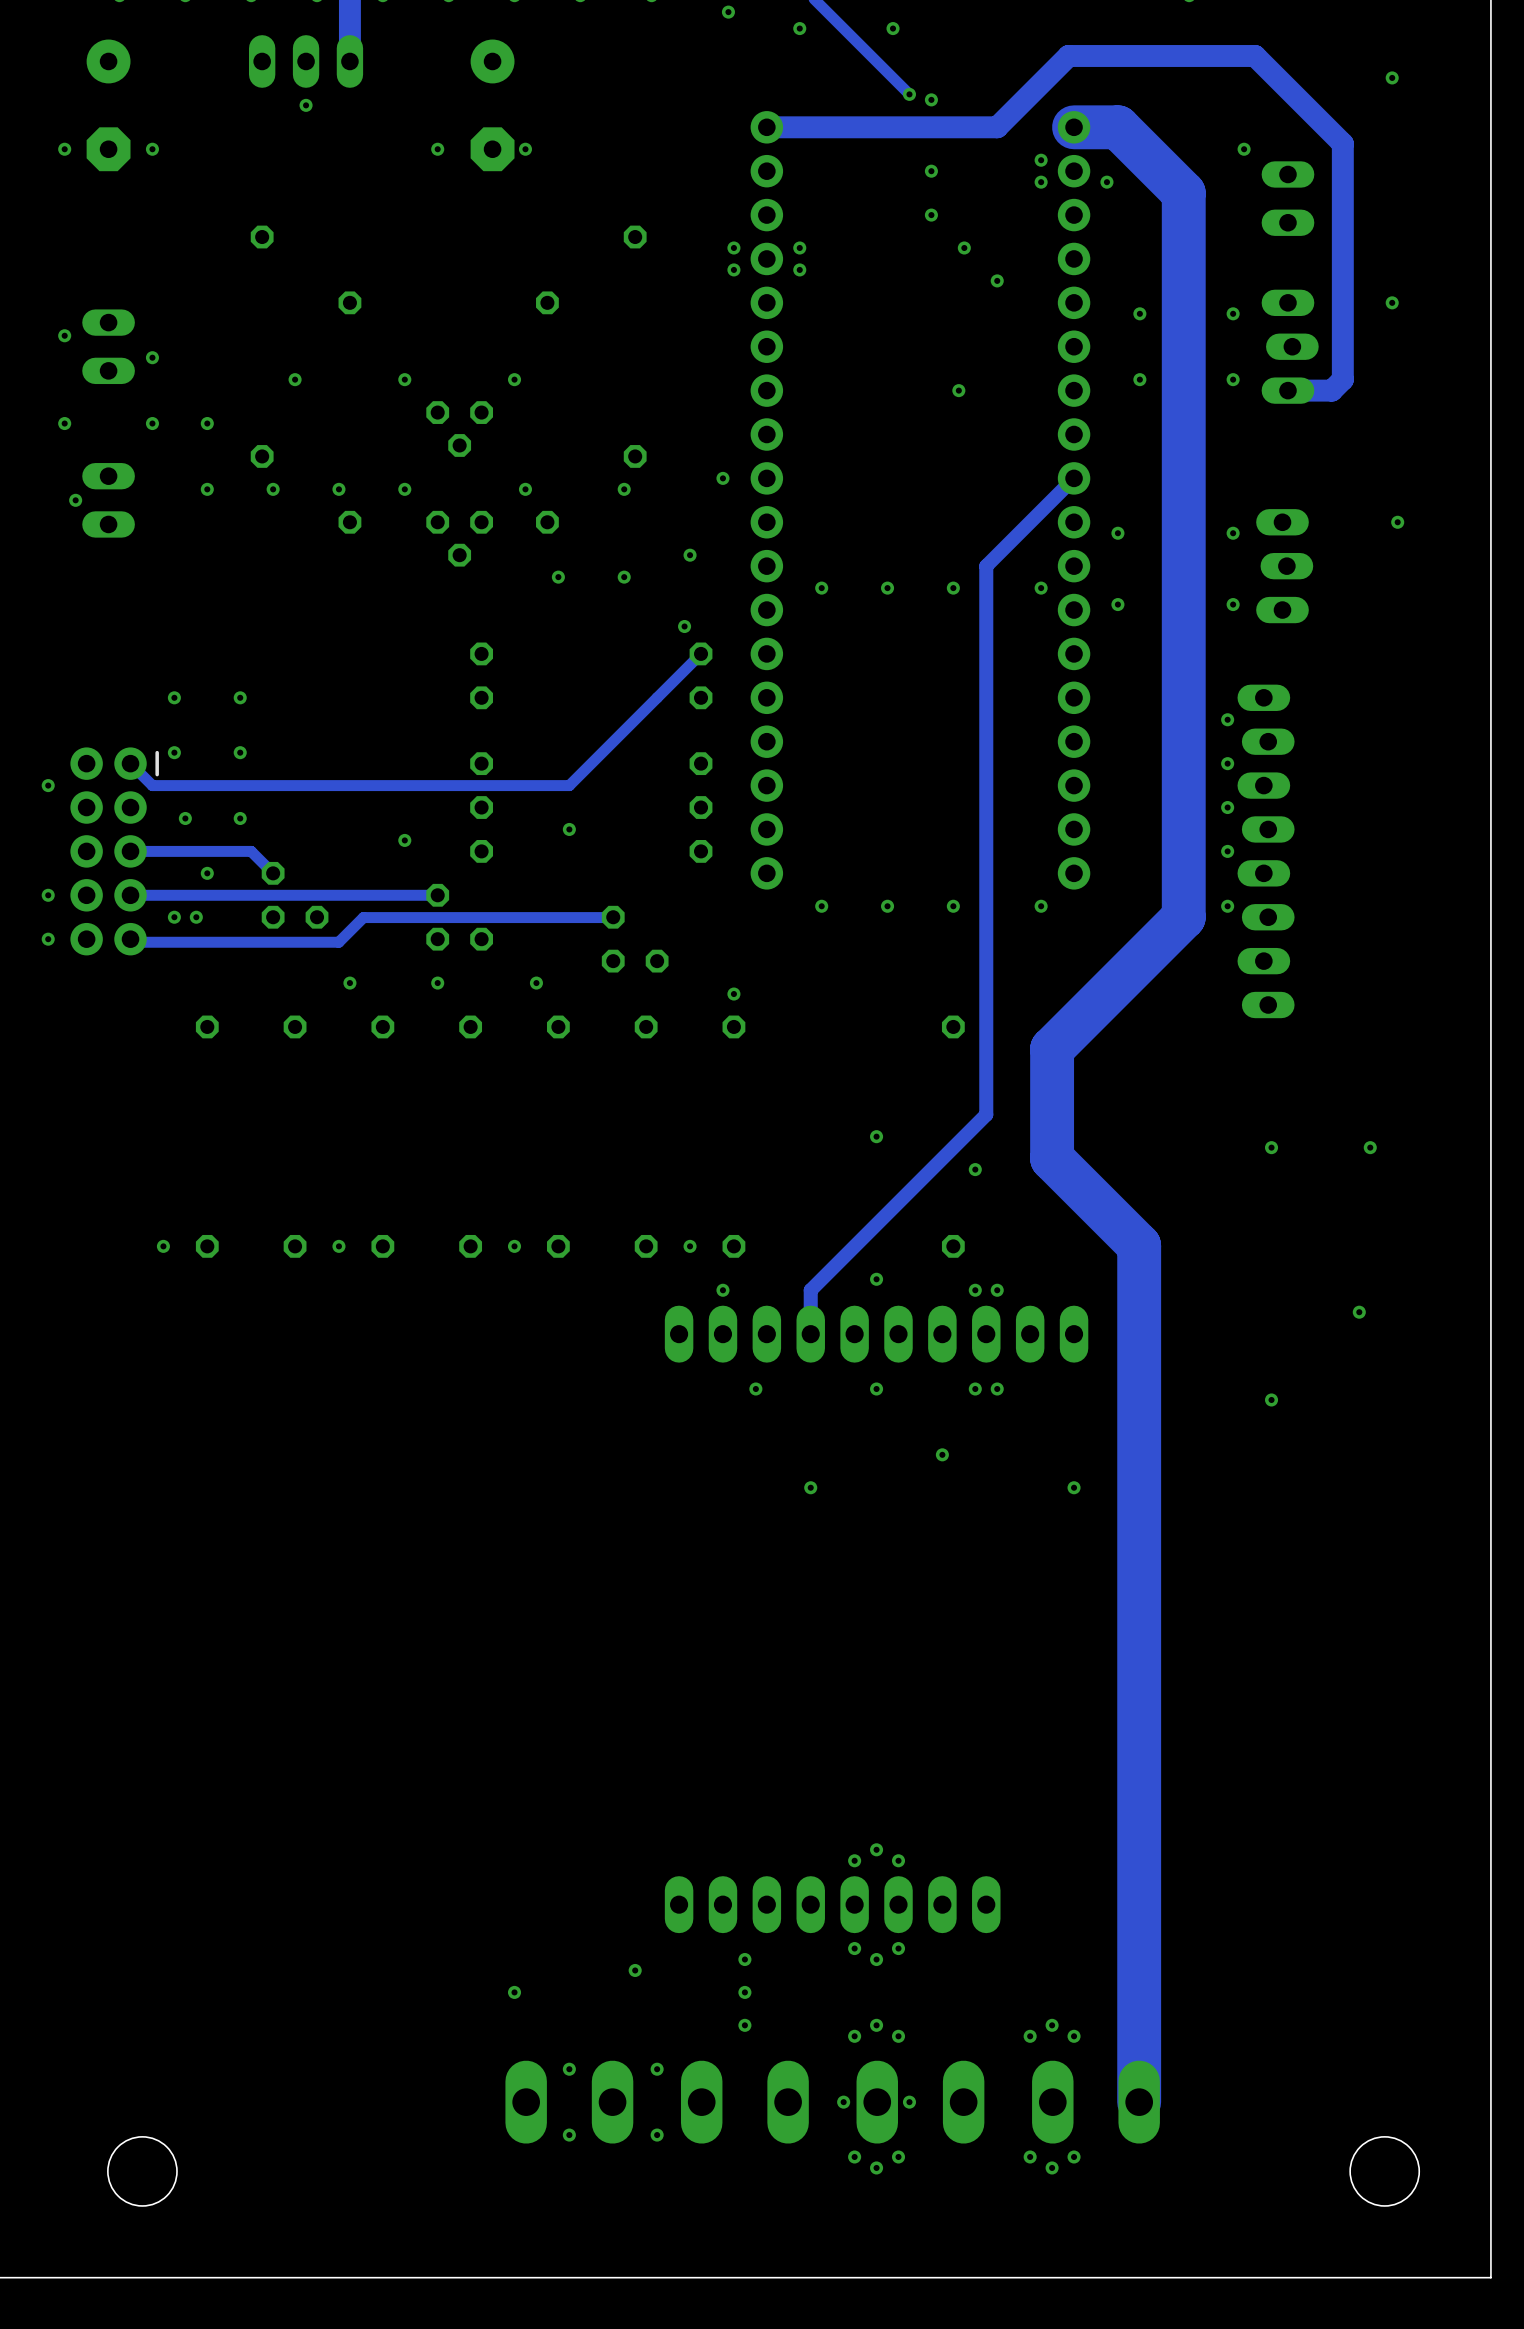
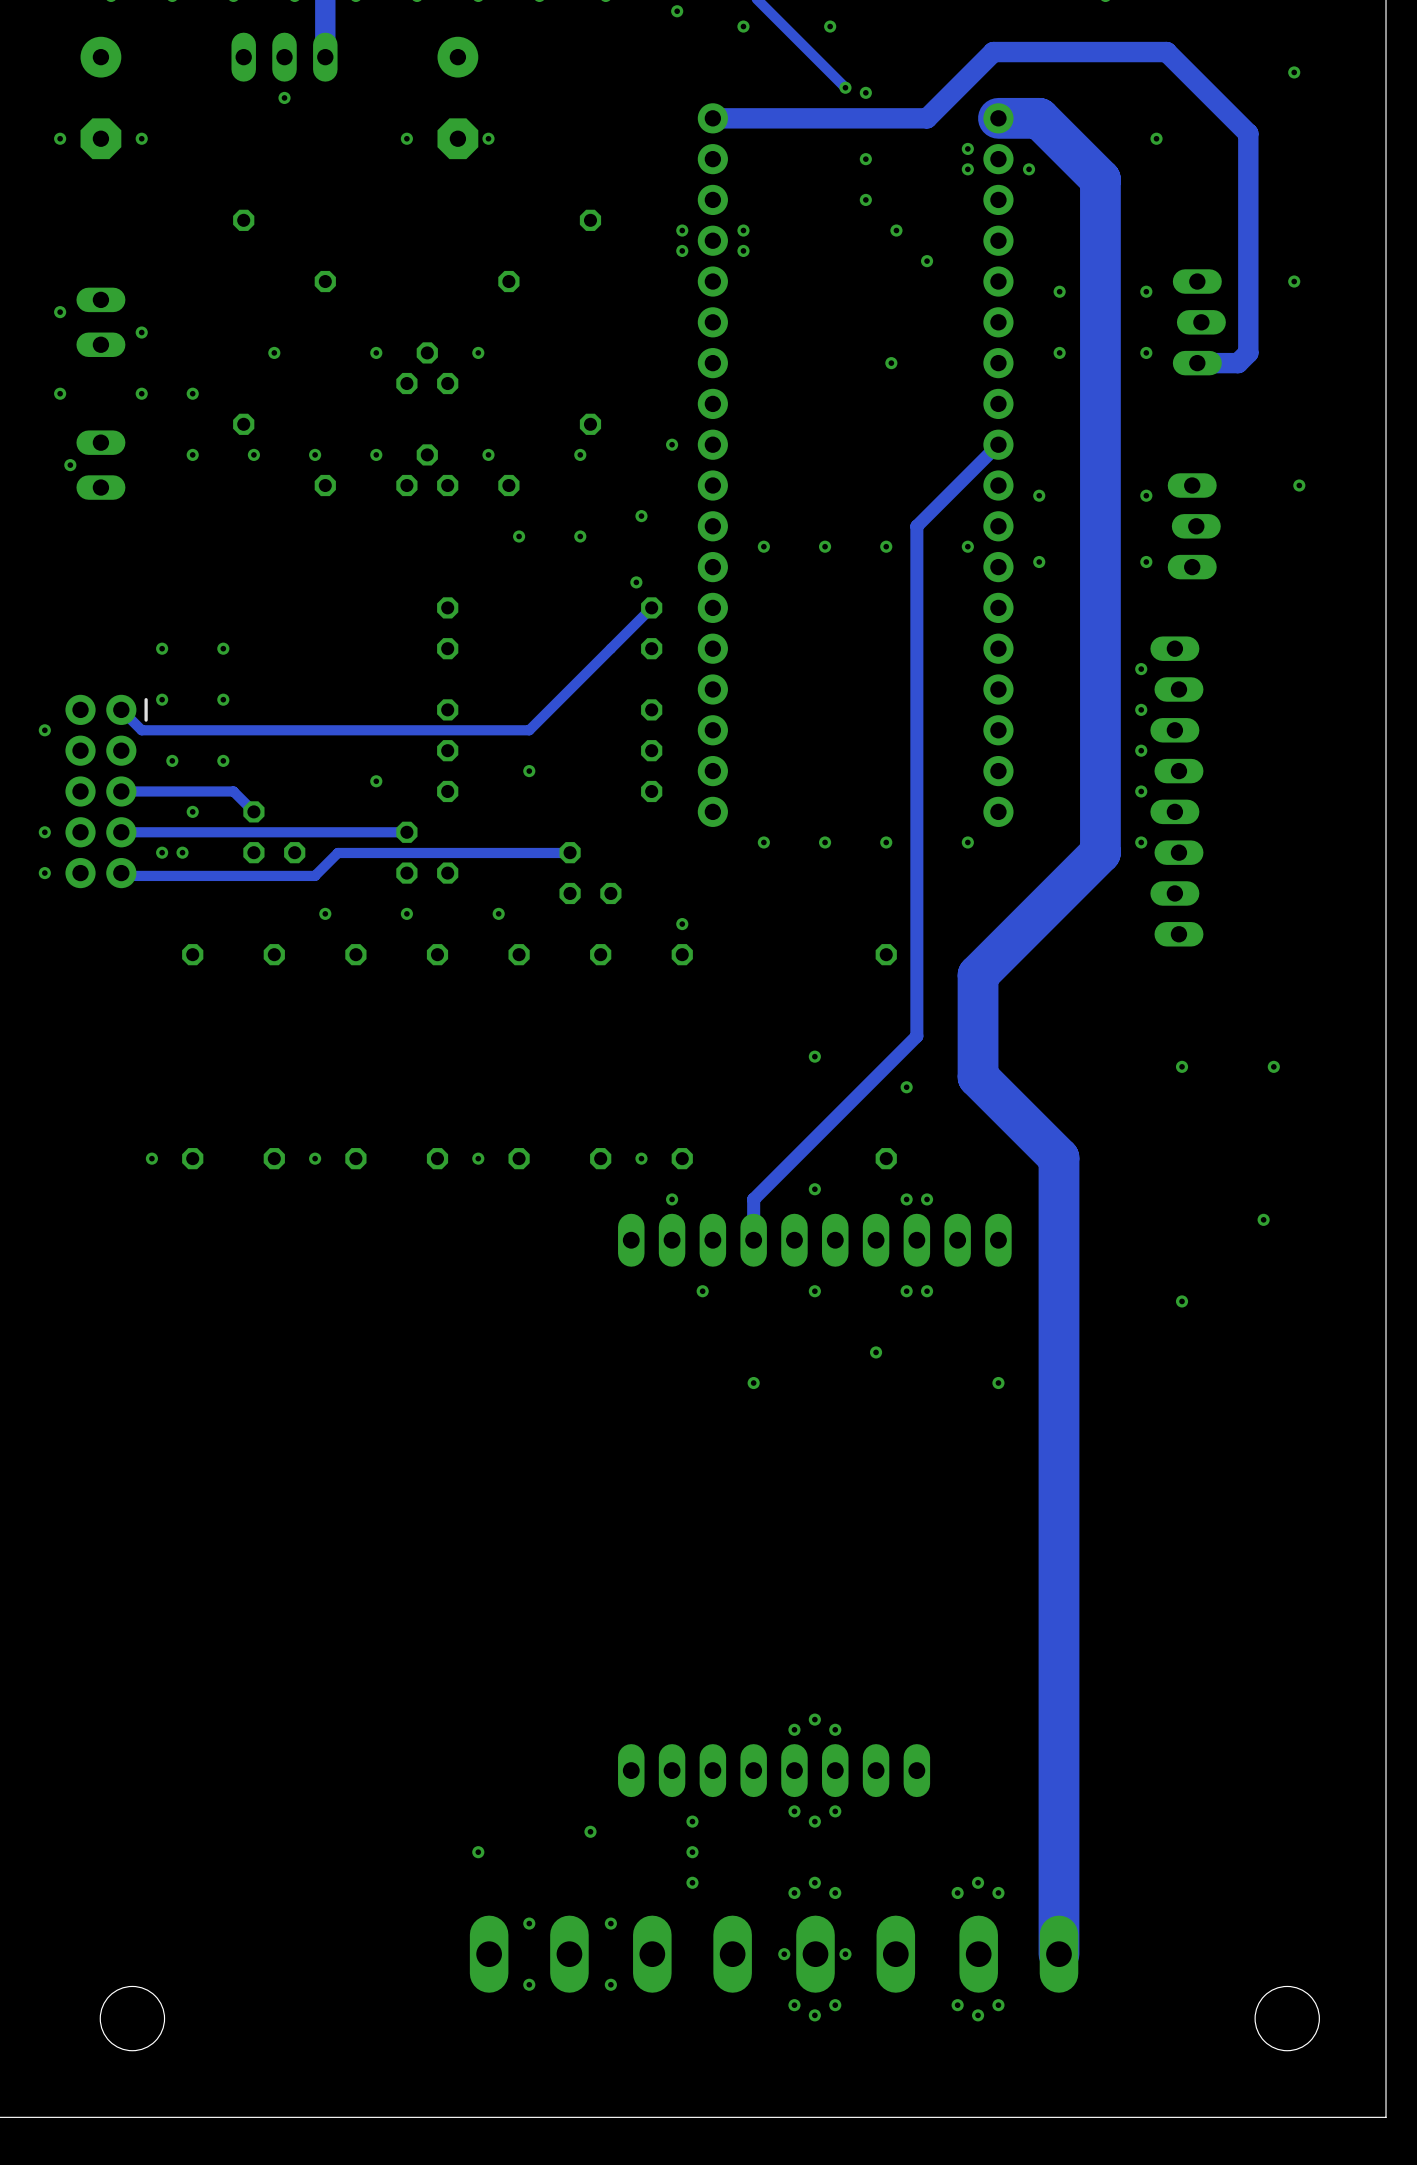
part: (1287, 198) -> none
part rotation: 0° (459, 429) -> 180° (427, 368)
part rotation: 0° (459, 538) -> 180° (427, 470)

